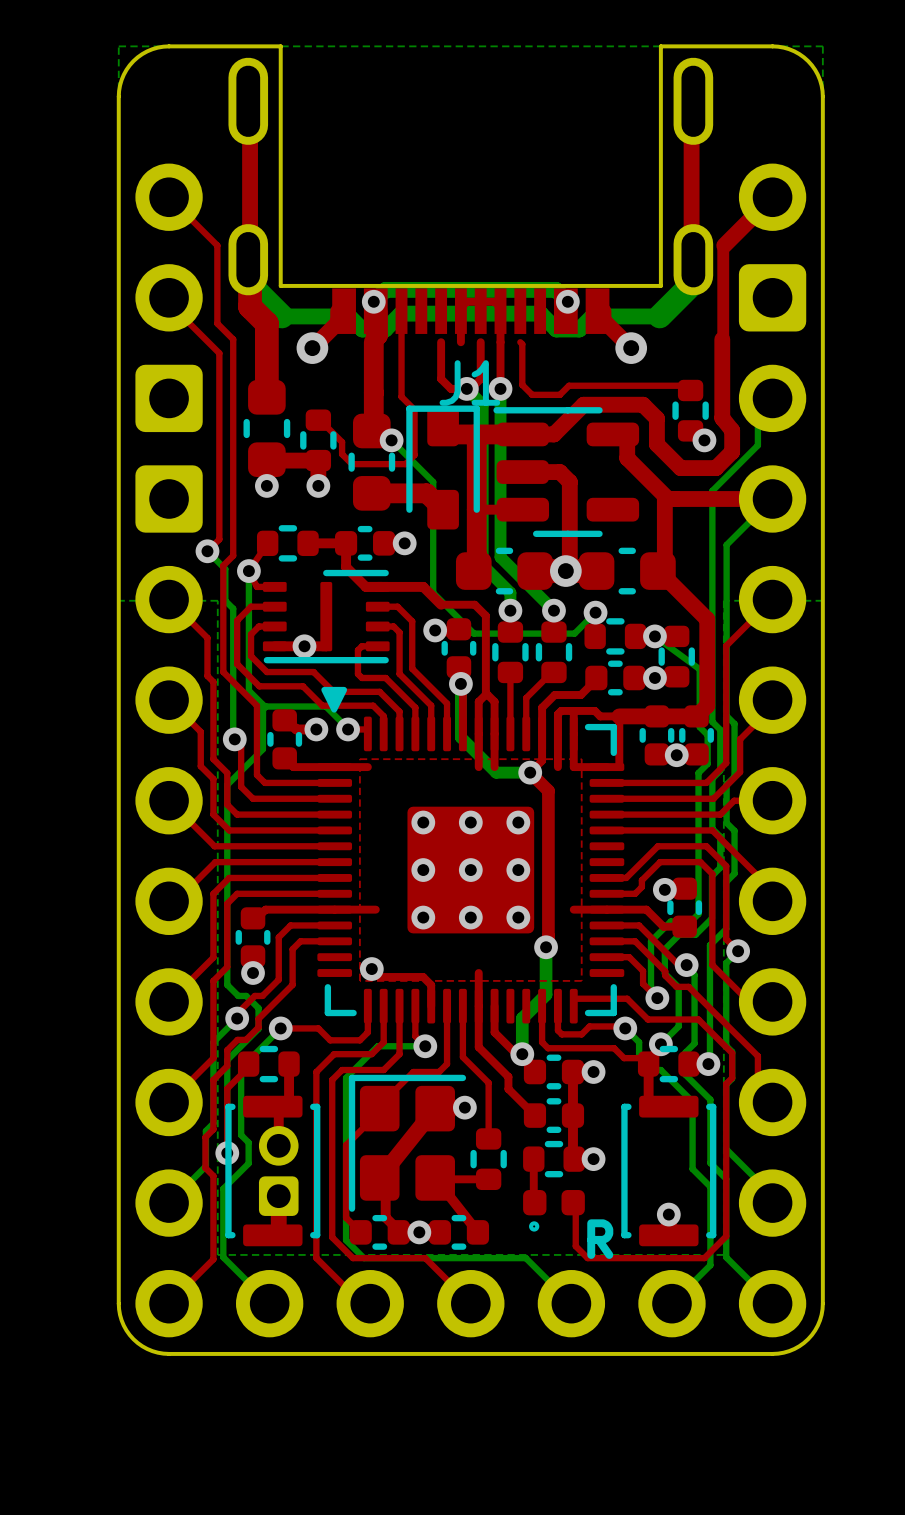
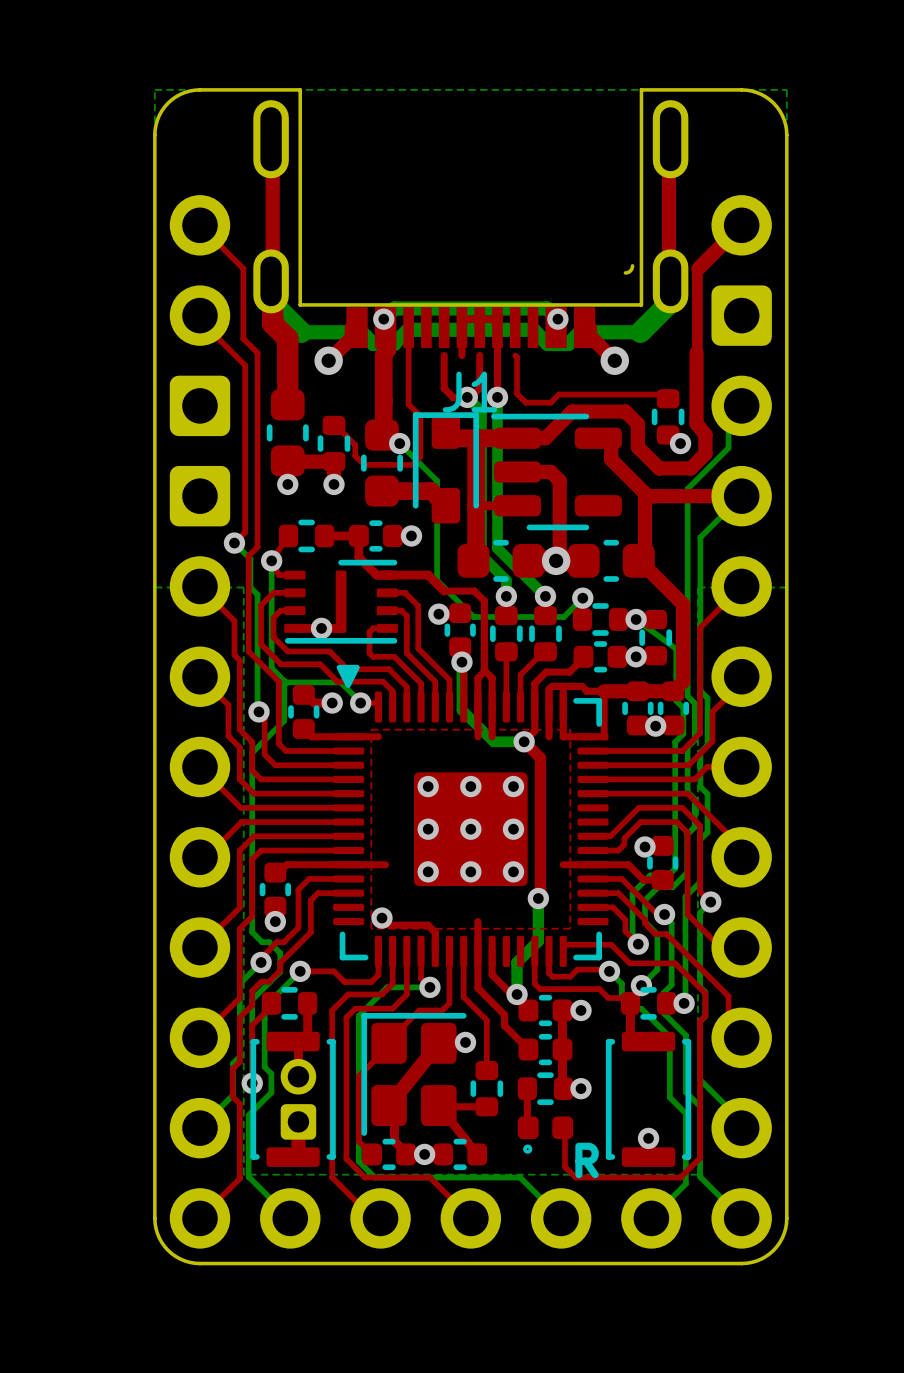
board edge: none -> (632, 265) (630, 270) (625, 272)

